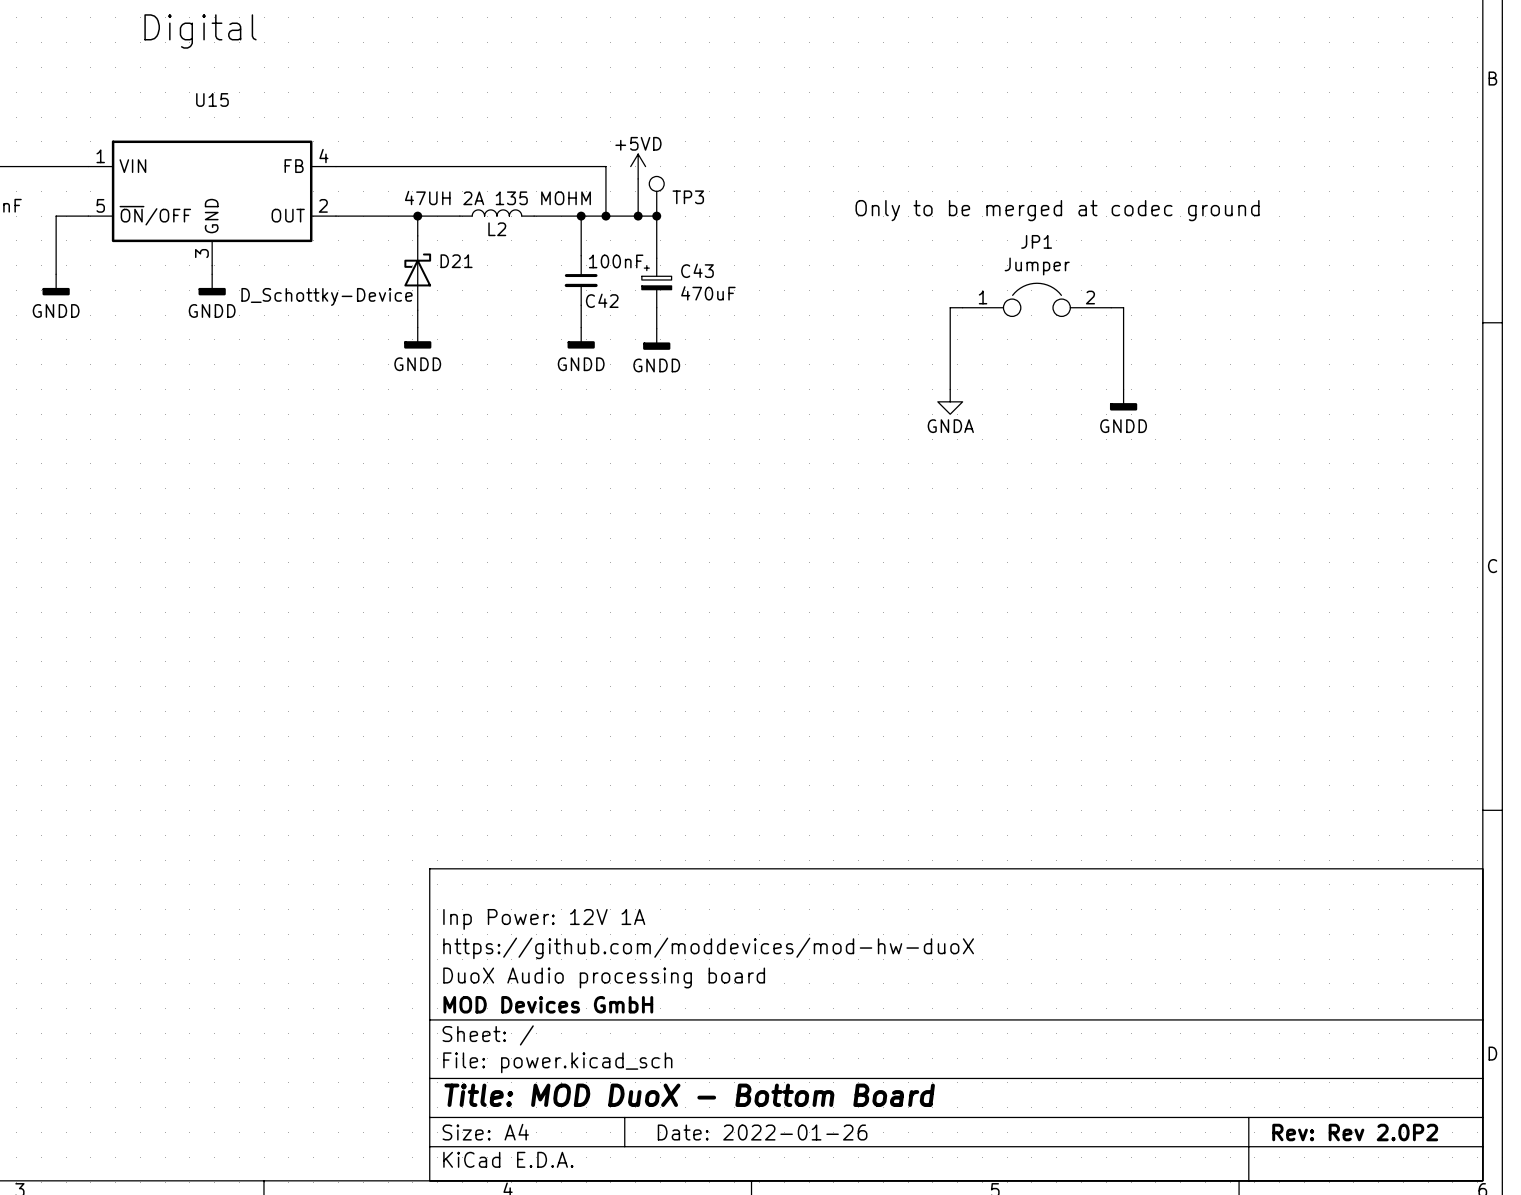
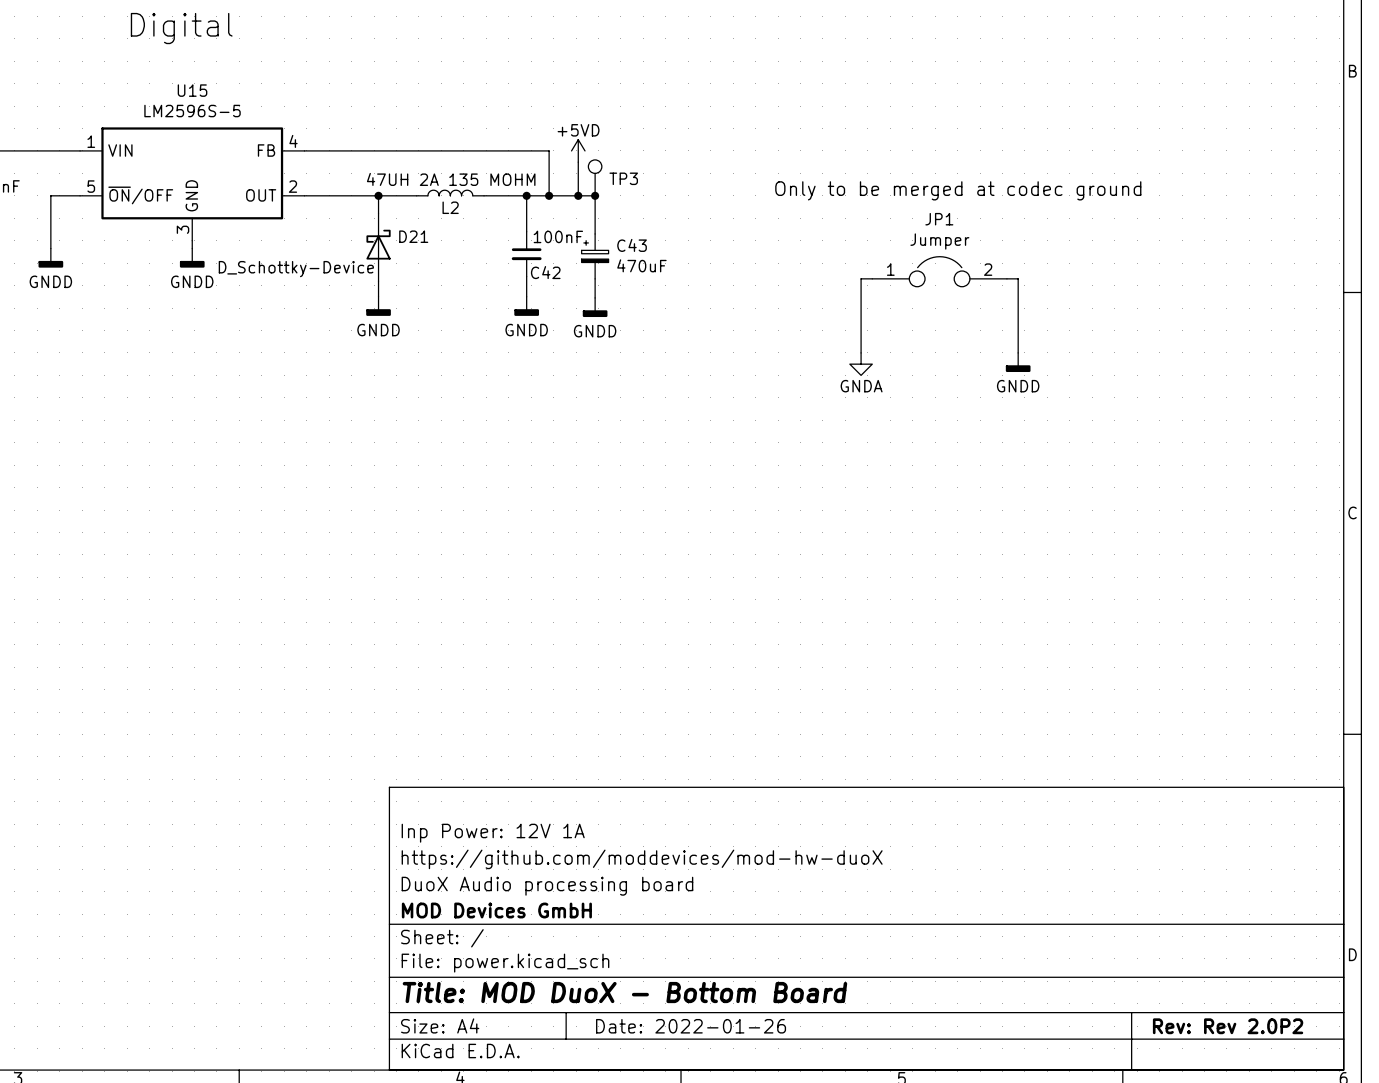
U15 value: none -> LM2596S-5 (192, 111)

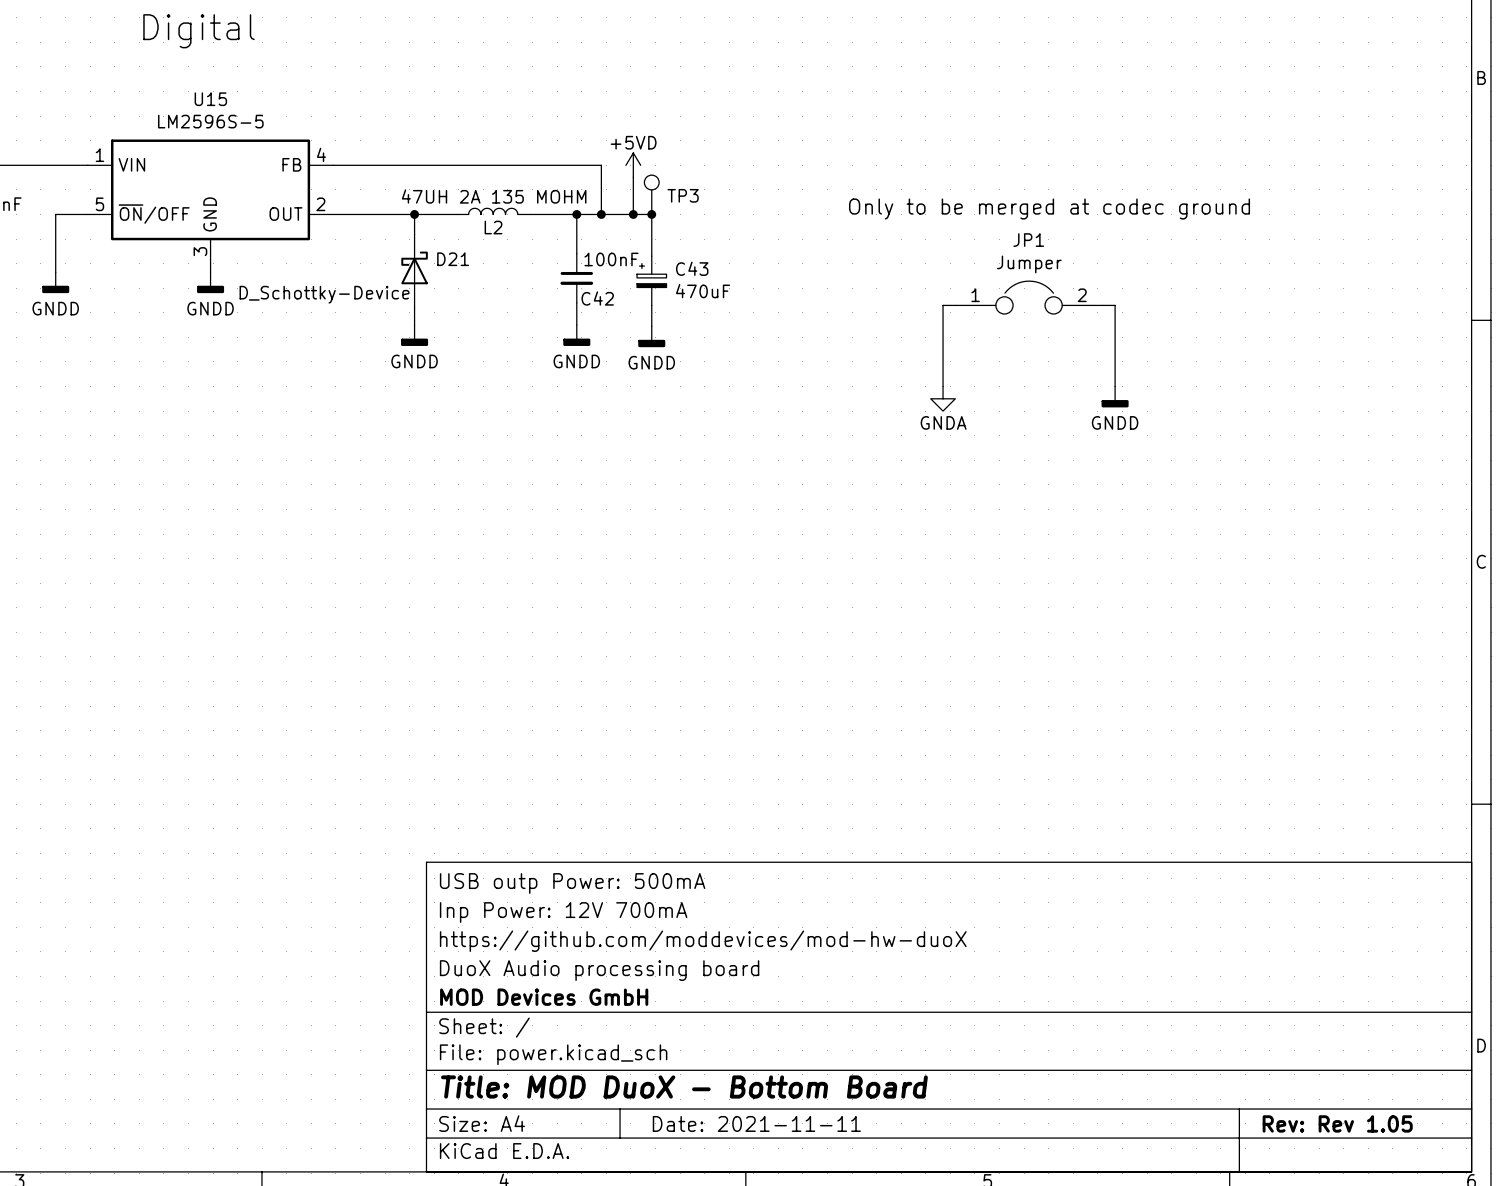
title block: none -> USB outp Power: 500mA (572, 883)
title block: Inp Power: 12V 1A (493, 833) -> Inp Power: 12V 700mA (563, 912)
title block: Date: 2022-01-26 (691, 1026) -> Date: 2021-11-11 (756, 1123)
title block: Rev: Rev 2.0P2 (1228, 1026) -> Rev: Rev 1.05 (1337, 1123)

